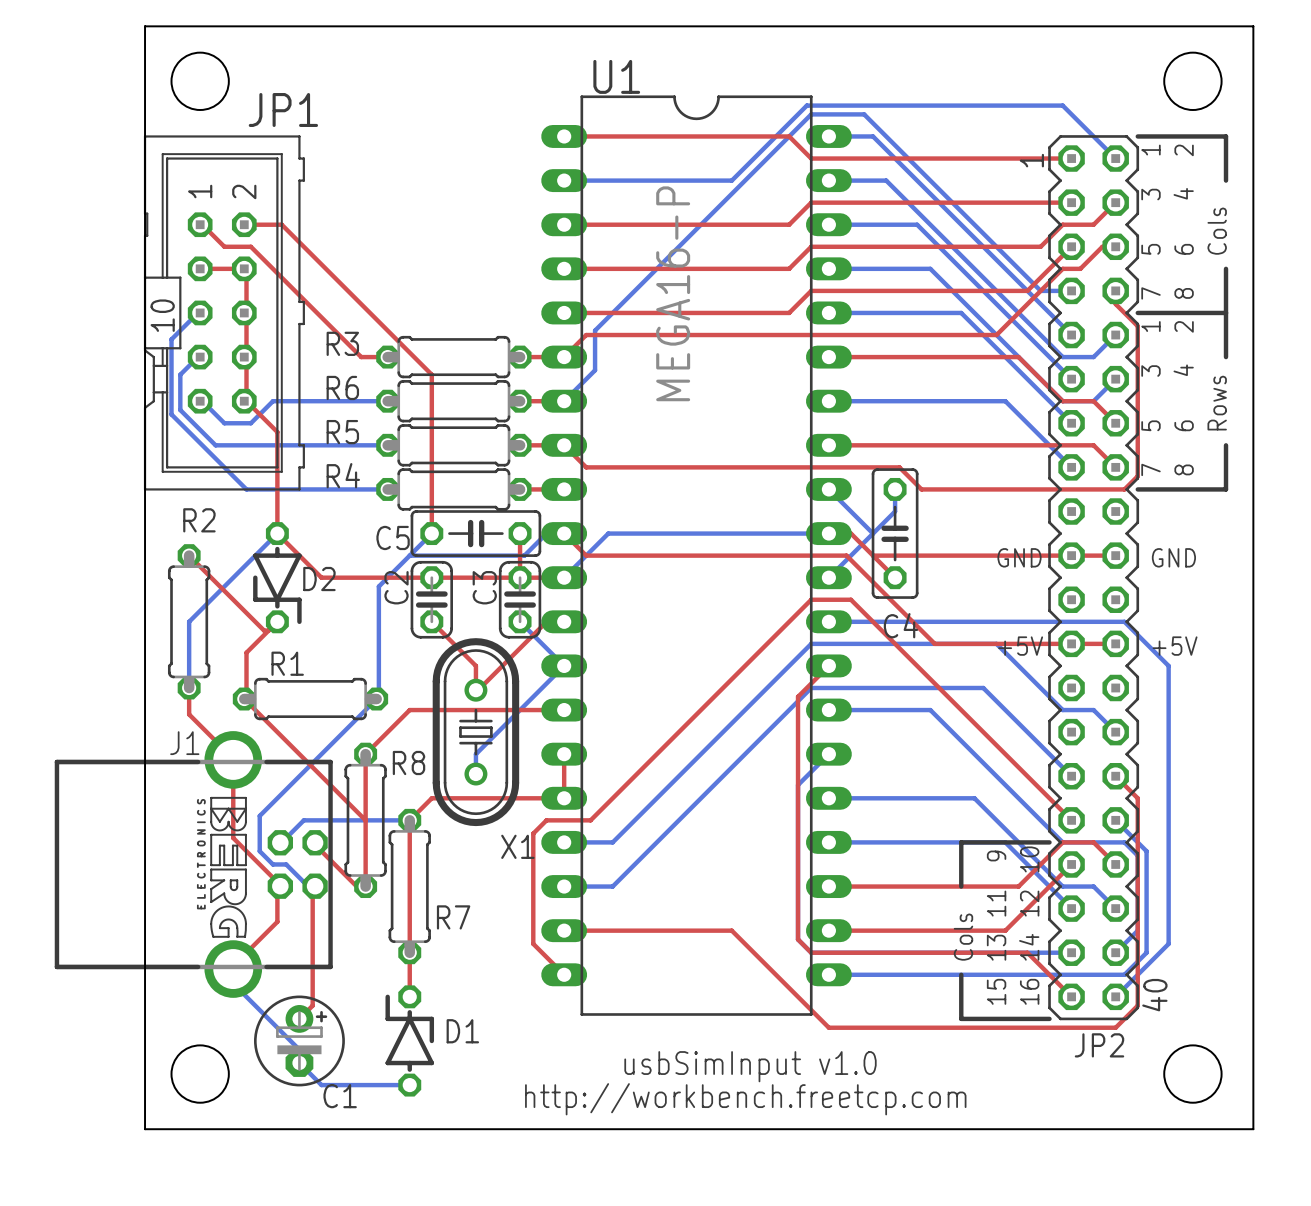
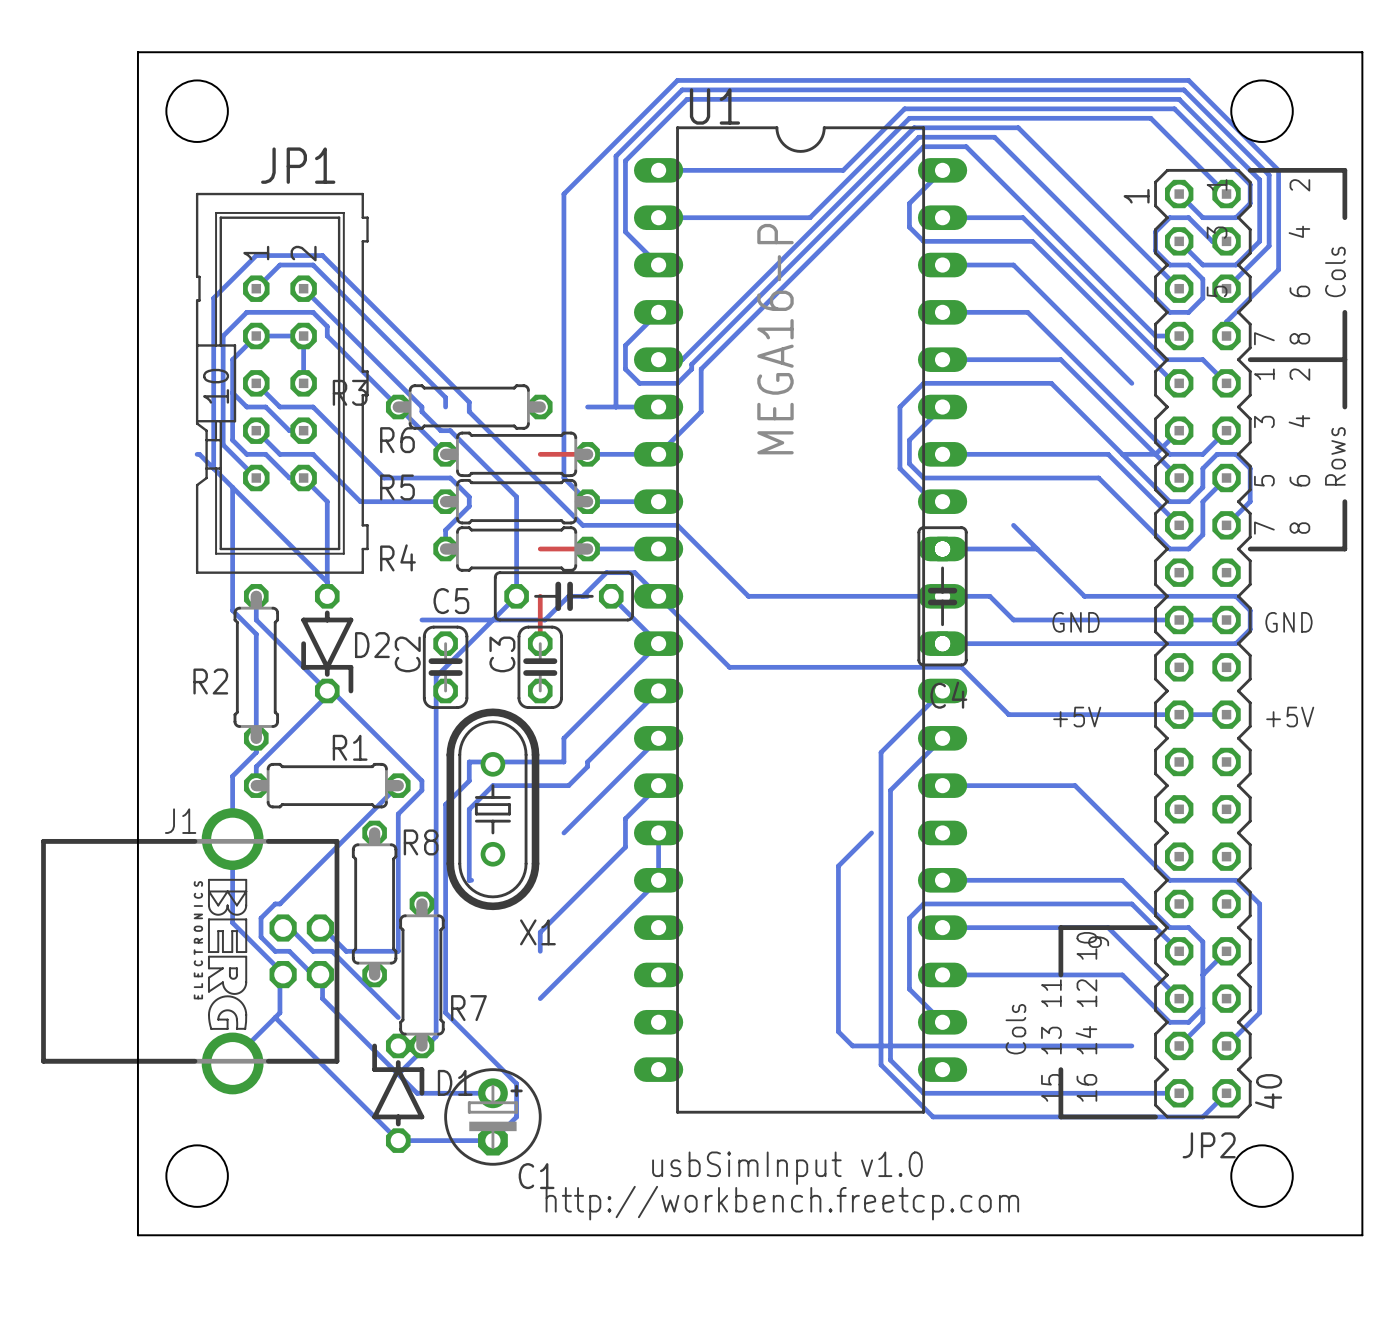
board edge: (1253, 26) (1253, 1129) -> (1326, 52) (1362, 52) (1362, 1235) (1326, 1235)
bottom track: (873, 105) (806, 105) (731, 180) -> (918, 137) (691, 364) (691, 369) (677, 383) (639, 383) (625, 369) (625, 345) (658, 312)
bottom track: (943, 105) (1062, 105) (1115, 158) -> (994, 137) (1169, 312) (1188, 312) (1202, 298) (1202, 279) (1188, 265) (1169, 265) (1155, 250) (1155, 231) (1169, 217) (1188, 217) (1212, 241) (1226, 241)
JP1 name position: JP1 (283, 110) -> JP1 (298, 165)
top track: (564, 136) (789, 136) (811, 158) (1071, 158) -> none
bottom track: none -> (658, 170) (843, 170) (904, 108) (1174, 108) (1250, 184) (1250, 203) (1236, 217) (1202, 217) (1179, 194)
bottom track: (828, 136) (873, 136) (961, 224) -> none
bottom track: none -> (942, 170) (909, 203) (909, 227) (923, 241) (1032, 241) (1174, 383) (1179, 383)
line: (1137, 136) (1181, 136) -> none
line: (1226, 136) (1226, 180) -> (1297, 170) (1344, 170) (1344, 217)
text position: 2 (1184, 150) -> 2 (1299, 185)
bottom track: none -> (1226, 194) (1150, 118) (909, 118) (810, 217) (767, 217)
bottom track: (564, 180) (630, 180) -> none
bottom track: (828, 180) (886, 180) (974, 268) -> none
bottom track: none -> (942, 217) (1023, 217) (1165, 359) (1202, 359) (1226, 383)
text position: 4 (1183, 193) -> 4 (1299, 231)
top track: (1071, 202) (811, 202) (789, 224) (564, 224) -> none
top track: (1115, 202) (1093, 224) (1062, 224) (1040, 246) (811, 246) (789, 268) (564, 268) -> none
bottom track: none -> (1179, 241) (1202, 265) (1236, 265) (1259, 241) (1259, 179) (1179, 99) (686, 99) (625, 160) (625, 231) (658, 265)
top track: (200, 224) (224, 246) (250, 246) (361, 357) (387, 357) -> none
top track: (244, 224) (281, 224) (431, 374) (431, 533) -> none
bottom track: (828, 224) (895, 224) -> none
bottom track: (917, 224) (1005, 312) -> (966, 265) (1013, 265)
text position: Cols (1217, 231) -> Cols (1335, 271)
bottom track: none -> (256, 288) (279, 265) (313, 265) (445, 397) (445, 407)
bottom track: none -> (303, 288) (421, 407) (421, 411) (440, 430) (450, 430) (516, 496) (516, 596) (436, 676) (436, 1036) (398, 1074)
top track: (1071, 246) (1027, 290) (811, 290) (789, 312) (564, 312) -> none
top track: (1115, 246) (1102, 246) (1080, 268) (1062, 268) (996, 335) (586, 335) (564, 357) (520, 357) -> none
bottom track: none -> (1179, 288) (1018, 127) (914, 127) (682, 359) (658, 359)
bottom track: none -> (1226, 288) (1269, 246) (1269, 175) (1183, 89) (682, 89) (615, 156) (615, 407)
text position: 6 (1184, 249) -> 6 (1299, 291)
top track: (200, 268) (246, 268) (246, 401) -> none
bottom track: (828, 268) (895, 268) -> (587, 407) (658, 407)
bottom track: (930, 268) (996, 335) -> (980, 312) (1027, 312)
line: (1226, 268) (1226, 357) -> (1344, 312) (1344, 407)
bottom track: (1071, 290) (1040, 290) (864, 114) (811, 114) (595, 330) (595, 370) (564, 401) -> (1179, 336) (1155, 336) (966, 146) (923, 146) (701, 369) (701, 411) (658, 454) (587, 454)
top track: (1115, 290) (1115, 304) (1137, 326) (1137, 476) (1124, 489) (921, 489) (899, 467) (586, 467) (564, 445) (520, 445) -> none
bottom track: none -> (1226, 336) (1226, 321) (1278, 269) (1278, 170) (1188, 80) (677, 80) (563, 194) (563, 478) (587, 501) (658, 501)
text position: 7 (1150, 293) -> 7 (1264, 338)
text position: 8 (1184, 293) -> 8 (1299, 338)
bottom track: (200, 312) (171, 339) (171, 414) (246, 489) (387, 489) -> none
JP1 position: (224, 312) -> (282, 383)
bottom track: (828, 312) (895, 312) -> none
bottom track: (961, 312) (1049, 401) -> (1013, 359) (1060, 359)
line: (1137, 312) (1181, 312) -> (1297, 359) (1344, 359)
text position: 1 (1150, 326) -> 1 (1264, 374)
text position: 2 (1184, 326) -> 2 (1299, 374)
bottom track: none -> (256, 383) (279, 407) (313, 407) (384, 478) (450, 478) (469, 496) (469, 506) (445, 530) (445, 549)
bottom track: none -> (303, 383) (303, 336) (256, 336) (232, 359) (232, 440) (246, 454) (265, 454) (289, 478) (303, 478) (327, 501) (327, 596)
bottom track: none -> (1051, 383) (923, 383) (899, 407) (899, 468) (933, 501) (942, 501)
bottom track: (1115, 335) (1093, 357) (1062, 357) -> (1226, 430) (1202, 454) (1169, 454) (1122, 407)
bottom track: none -> (232, 392) (246, 407) (265, 407) (289, 430) (303, 430)
bottom track: (200, 357) (180, 374) (180, 410) (215, 445) (352, 445) -> none
top track: (828, 357) (1018, 357) (1062, 401) (1093, 401) (1115, 423) -> none
bottom track: none -> (942, 407) (909, 440) (909, 463) (923, 478) (1098, 478) (1169, 549) (1188, 549) (1202, 534) (1202, 501) (1226, 478)
text position: 4 (1183, 370) -> 4 (1299, 421)
text position: 3 (1150, 371) -> 3 (1264, 421)
bottom track: none -> (1131, 430) (1179, 478)
top track: (246, 401) (277, 432) (277, 533) (321, 577) (564, 577) -> none
bottom track: (277, 401) (272, 401) (250, 423) (224, 423) -> (279, 454) (256, 430)
bottom track: (308, 401) (387, 401) -> (313, 454) (360, 501)
bottom track: none -> (445, 454) (327, 336) (327, 326) (313, 312) (246, 312) (223, 336) (223, 444) (256, 478)
R6 position: (453, 401) -> (516, 454)
bottom track: (828, 401) (895, 401) -> (587, 549) (658, 549)
bottom track: (1005, 401) (1071, 467) -> (1060, 454) (1108, 454)
bottom track: none -> (1122, 454) (1169, 501) (1188, 501) (1202, 487) (1202, 468) (1217, 454) (1236, 454) (1250, 468) (1250, 501) (1226, 525)
text position: Rows (1217, 403) -> Rows (1335, 456)
bottom track: none -> (223, 478) (327, 582)
text position: 5 (1150, 425) -> 5 (1264, 480)
text position: 6 (1184, 425) -> 6 (1299, 480)
bottom track: none -> (398, 501) (445, 501)
R5 position: (453, 445) -> (516, 501)
top track: (828, 445) (1093, 445) (1115, 467) -> none
line: (1226, 445) (1226, 489) -> (1344, 501) (1344, 549) (1297, 549)
bottom track: none -> (1013, 525) (1084, 596) (1236, 596) (1250, 610) (1250, 629) (1236, 643) (942, 643)
text position: 7 (1150, 469) -> 7 (1264, 528)
text position: 8 (1184, 469) -> 8 (1299, 528)
R4 name position: R4 (343, 475) -> R4 (397, 557)
R4 position: (453, 489) -> (516, 549)
bottom track: (828, 489) (873, 533) -> (1131, 478) (1179, 525)
bottom track: (895, 489) (895, 511) (828, 577) -> (942, 549) (1037, 549)
line: (1137, 489) (1181, 489) -> (1108, 927) (1155, 927)
R2 name position: R2 (199, 520) -> R2 (210, 681)
bottom track: none -> (256, 596) (256, 619) (327, 690) (327, 695)
bottom track: (277, 533) (189, 621) (189, 687) -> none
bottom track: (431, 533) (378, 586) (378, 696) (259, 815) (259, 833) -> (398, 785) (279, 903) (275, 903) (261, 918)
C5 position: (475, 533) -> (563, 596)
top track: (564, 533) (586, 555) (846, 555) (934, 643) (1115, 643) -> none
bottom track: none -> (611, 596) (658, 643) (563, 738) (563, 761) (469, 761) (469, 780) (445, 804) (445, 1012) (516, 1083) (516, 1116) (492, 1140) (398, 1140) (275, 1017)
bottom track: (714, 533) (608, 533) (564, 577) -> (748, 596) (677, 525) (582, 525) (469, 411) (469, 402) (322, 255) (256, 255) (213, 298) (213, 468)
top track: (828, 533) (850, 533) (895, 577) -> none
bottom track: none -> (871, 596) (989, 596) (1013, 619) (1226, 619)
C5 name position: C5 (393, 537) -> C5 (451, 601)
top track: (189, 555) (264, 630) (268, 630) -> none
U1 position: (696, 555) -> (800, 619)
top track: (873, 555) (1115, 555) -> none
text position: GND (1173, 557) -> GND (1288, 622)
D2 position: (277, 577) -> (327, 643)
JP2 position: (1093, 577) -> (1202, 643)
R2 position: (189, 621) -> (256, 667)
top track: (277, 621) (246, 652) (246, 696) (244, 699) (365, 820) -> none
top track: (431, 621) (475, 665) (475, 692) (546, 621) (564, 621) -> none
bottom track: (520, 621) (564, 665) (475, 754) (475, 774) -> none
bottom track: none -> (658, 690) (587, 761) (587, 766) (568, 785) (492, 785) (469, 809) (469, 880) (471, 880)
bottom track: (828, 621) (1124, 621) (1168, 665) (1168, 943) -> none
bottom track: none -> (942, 690) (881, 752) (881, 1064) (933, 1116) (1202, 1116) (1226, 1093)
bottom track: none -> (327, 695) (256, 766) (256, 785)
bottom track: none -> (327, 695) (336, 695) (421, 780) (421, 790) (398, 814) (398, 951) (346, 951) (322, 927) (320, 928)
bottom track: (956, 643) (811, 643) (612, 842) (564, 842) -> (1008, 714) (961, 667) (729, 667) (634, 572) (606, 572) (582, 596)
bottom track: (996, 643) (1062, 710) (1093, 710) (1115, 732) -> (1051, 714) (1226, 714)
text position: +5V (1175, 646) -> +5V (1290, 717)
R1 name position: R1 (287, 663) -> R1 (350, 747)
bottom track: none -> (658, 738) (563, 832)
top track: (828, 665) (798, 696) (798, 939) (811, 952) (1027, 952) (1071, 996) -> none
top track: (189, 687) (189, 714) (233, 758) (233, 838) (280, 886) (277, 886) (277, 921) (233, 965) (233, 969) -> none
R1 position: (310, 699) -> (327, 785)
top track: (564, 710) (409, 710) (365, 754) (365, 886) (356, 886) (315, 842) -> none
bottom track: none -> (658, 785) (625, 818) (625, 847) (540, 932) (540, 951)
bottom track: (828, 710) (895, 710) -> none
bottom track: (930, 710) (1062, 842) (1106, 842) -> (980, 785) (1075, 785) (1169, 880) (1236, 880) (1259, 903) (1259, 1012) (1236, 1036)
top track: (564, 754) (564, 798) (431, 798) (409, 820) (409, 996) -> none
bottom track: none -> (658, 832) (658, 880) (540, 998)
bottom track: (1071, 776) (983, 687) (811, 687) (612, 886) (564, 886) -> none
top track: (1115, 776) (1137, 798) (1137, 1005) (1115, 1027) (828, 1027) (731, 930) (564, 930) -> none
bottom track: (828, 798) (895, 798) -> none
bottom track: (974, 798) (1062, 886) (1093, 886) -> (1027, 880) (1122, 880) (1169, 927)
bottom track: (409, 820) (303, 820) (280, 842) -> (398, 1017) (332, 951) (313, 951) (294, 932) (284, 932) (283, 928)
top track: (1071, 820) (850, 599) (811, 599) (590, 820) (546, 820) (533, 833) (533, 943) (564, 974) -> none
bottom track: (1115, 820) (1146, 851) (1146, 952) (1124, 974) (828, 974) -> none
bottom track: (828, 842) (895, 842) -> none
line: (1005, 842) (961, 842) (961, 886) -> (1060, 927) (1060, 974)
bottom track: (1005, 842) (1071, 908) -> (1060, 927) (1108, 927) (1155, 974)
text position: 9 (996, 855) -> 9 (1098, 942)
top track: (1071, 864) (1005, 930) (828, 930) -> none
top track: (1115, 864) (1093, 842) (1062, 842) (1018, 886) (828, 886) -> none
bottom track: none -> (1179, 951) (1131, 903) (923, 903) (909, 918) (909, 989) (942, 1022)
bottom track: none -> (1226, 951) (1202, 974)
top track: (315, 886) (312, 886) (312, 1005) (299, 1018) -> none
bottom track: none -> (320, 974) (322, 974) (322, 998) (417, 1093) (492, 1093)
bottom track: none -> (942, 974) (1122, 974) (1169, 1022) (1188, 1022) (1202, 1008)
bottom track: (1159, 952) (1115, 996) -> (942, 738) (890, 790) (890, 1060) (923, 1093) (1179, 1093)
bottom track: (233, 969) (233, 983) (299, 1049) (299, 1063) (321, 1085) (409, 1085) -> (232, 1063) (232, 1060) (279, 1012) (279, 974) (283, 974) (232, 922) (232, 776) (256, 752) (256, 634) (232, 610) (232, 487)
line: (961, 974) (961, 1018) (1005, 1018) -> (1060, 1069) (1060, 1116)
line: none -> (1108, 1116) (1155, 1116)
C1 position: (299, 1040) -> (492, 1116)
D1 position: (409, 1040) -> (398, 1093)

